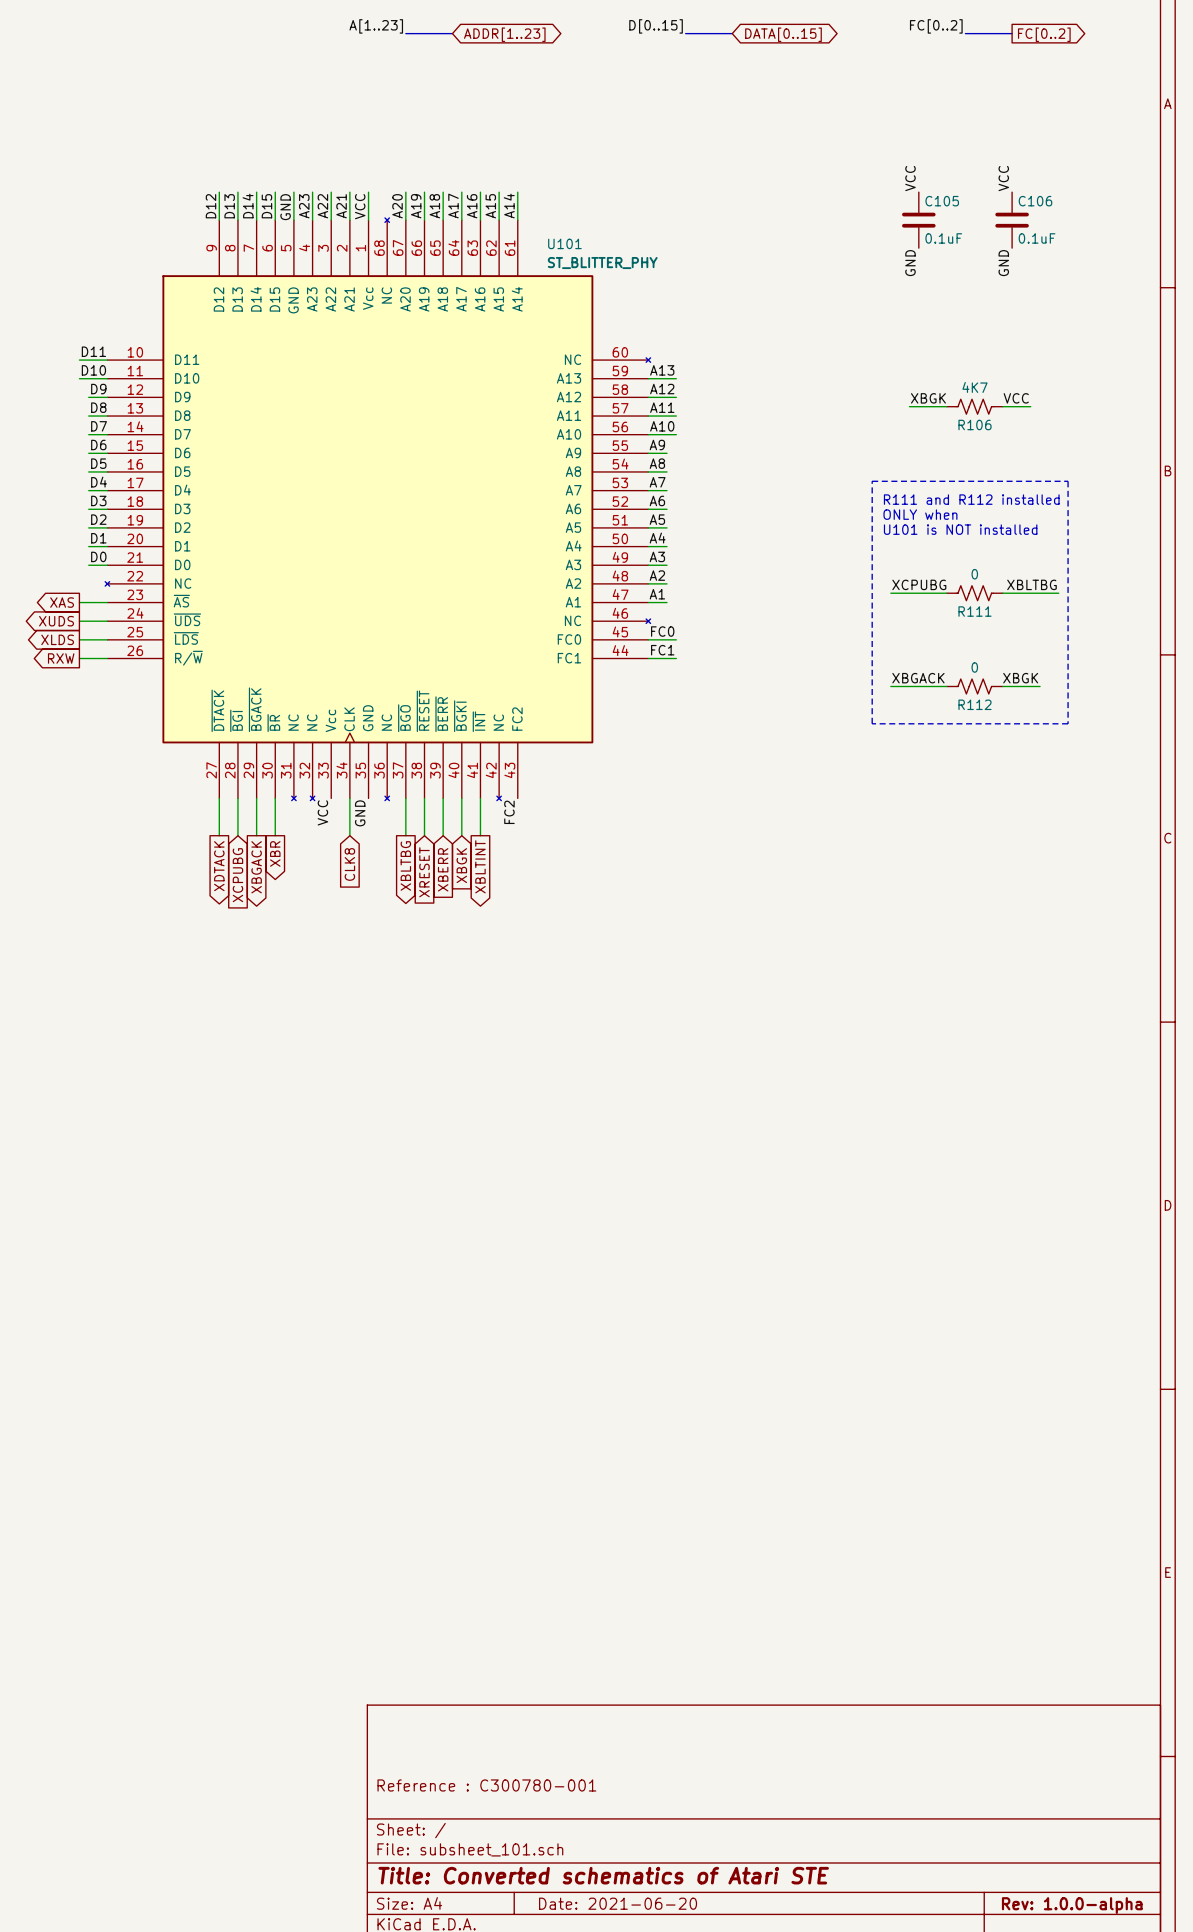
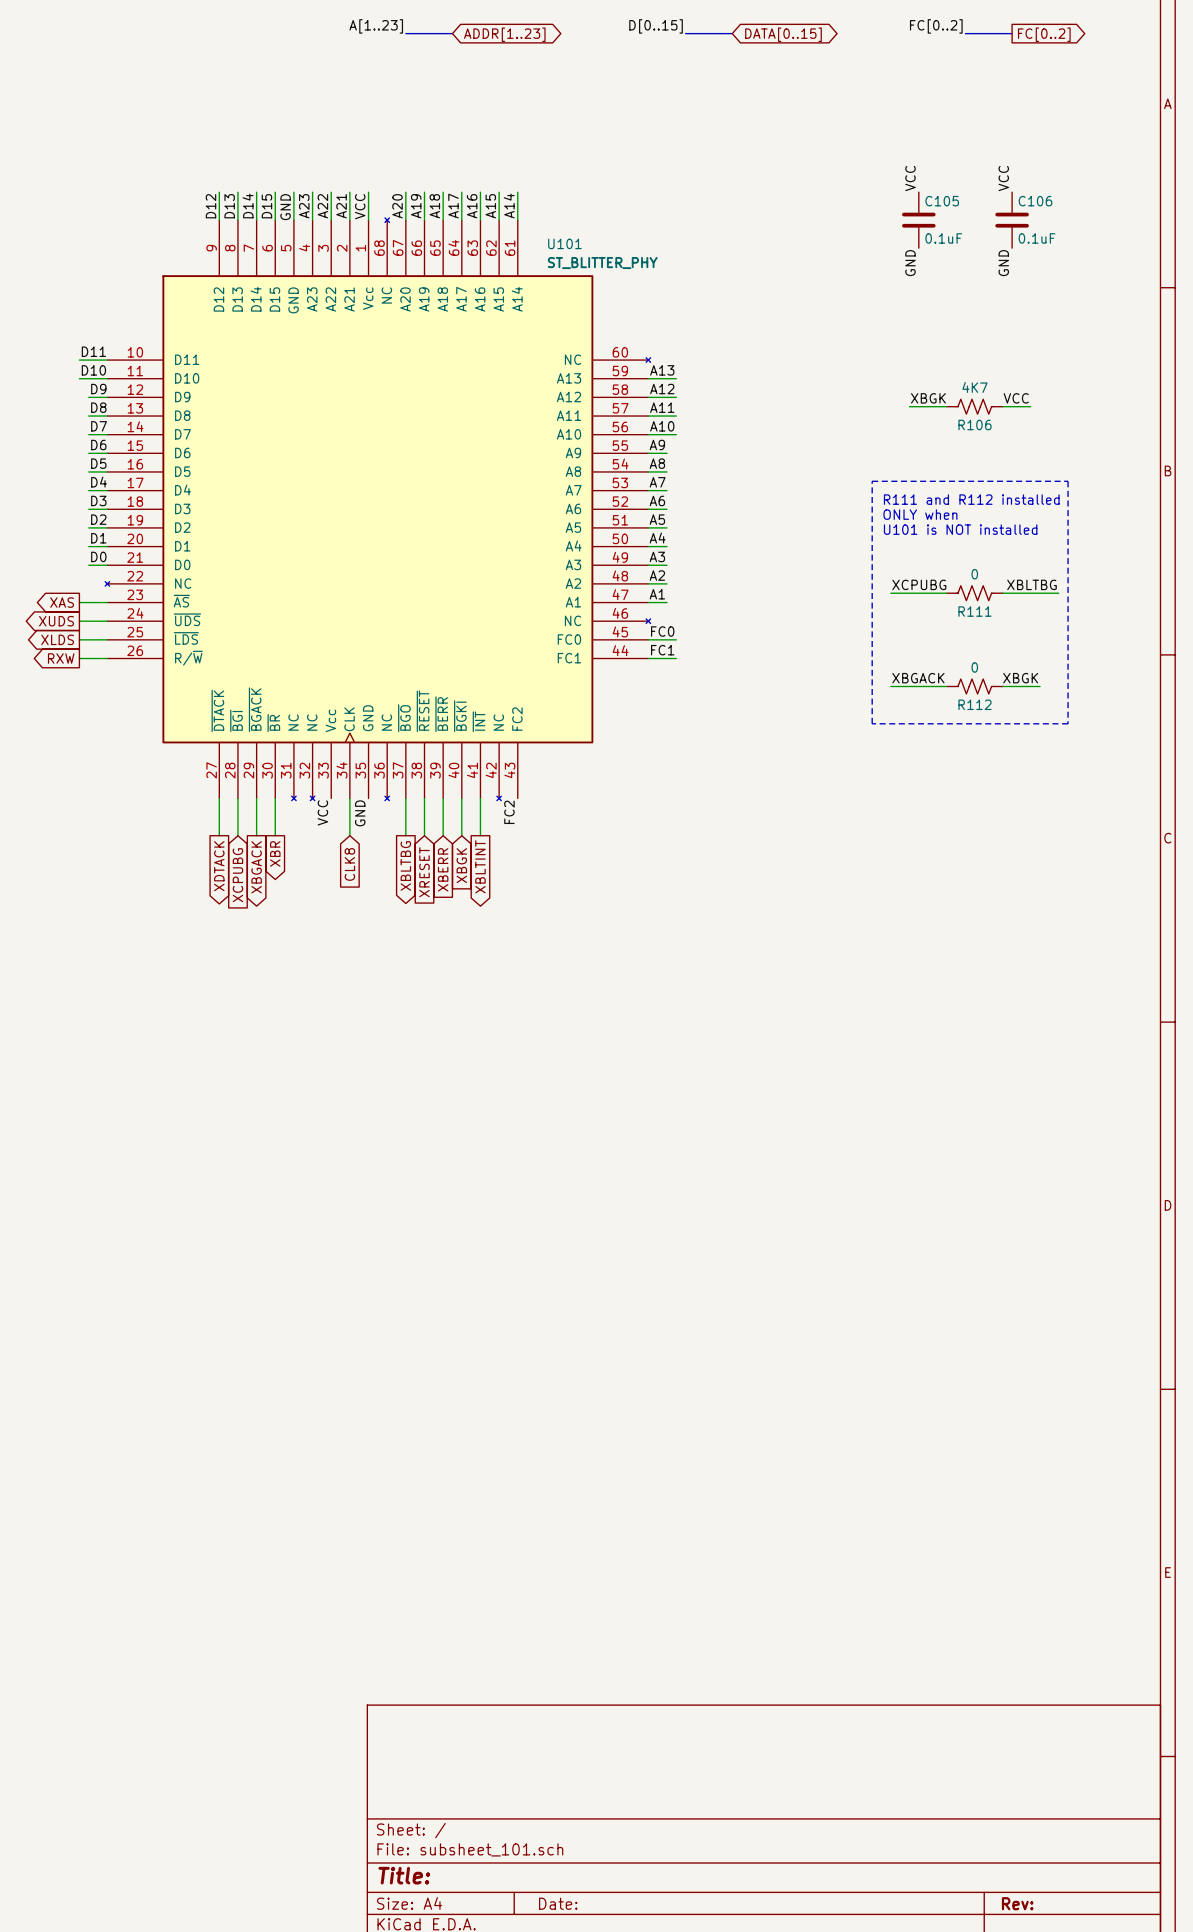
title block: Reference : C300780-001 (486, 1785) -> none
title block: Title: Converted schematics of Atari STE (603, 1875) -> Title: (404, 1875)
title block: Date: 2021-06-20 (618, 1903) -> Date: (558, 1903)
title block: Rev: 1.0.0-alpha (1072, 1905) -> Rev: (1017, 1903)

